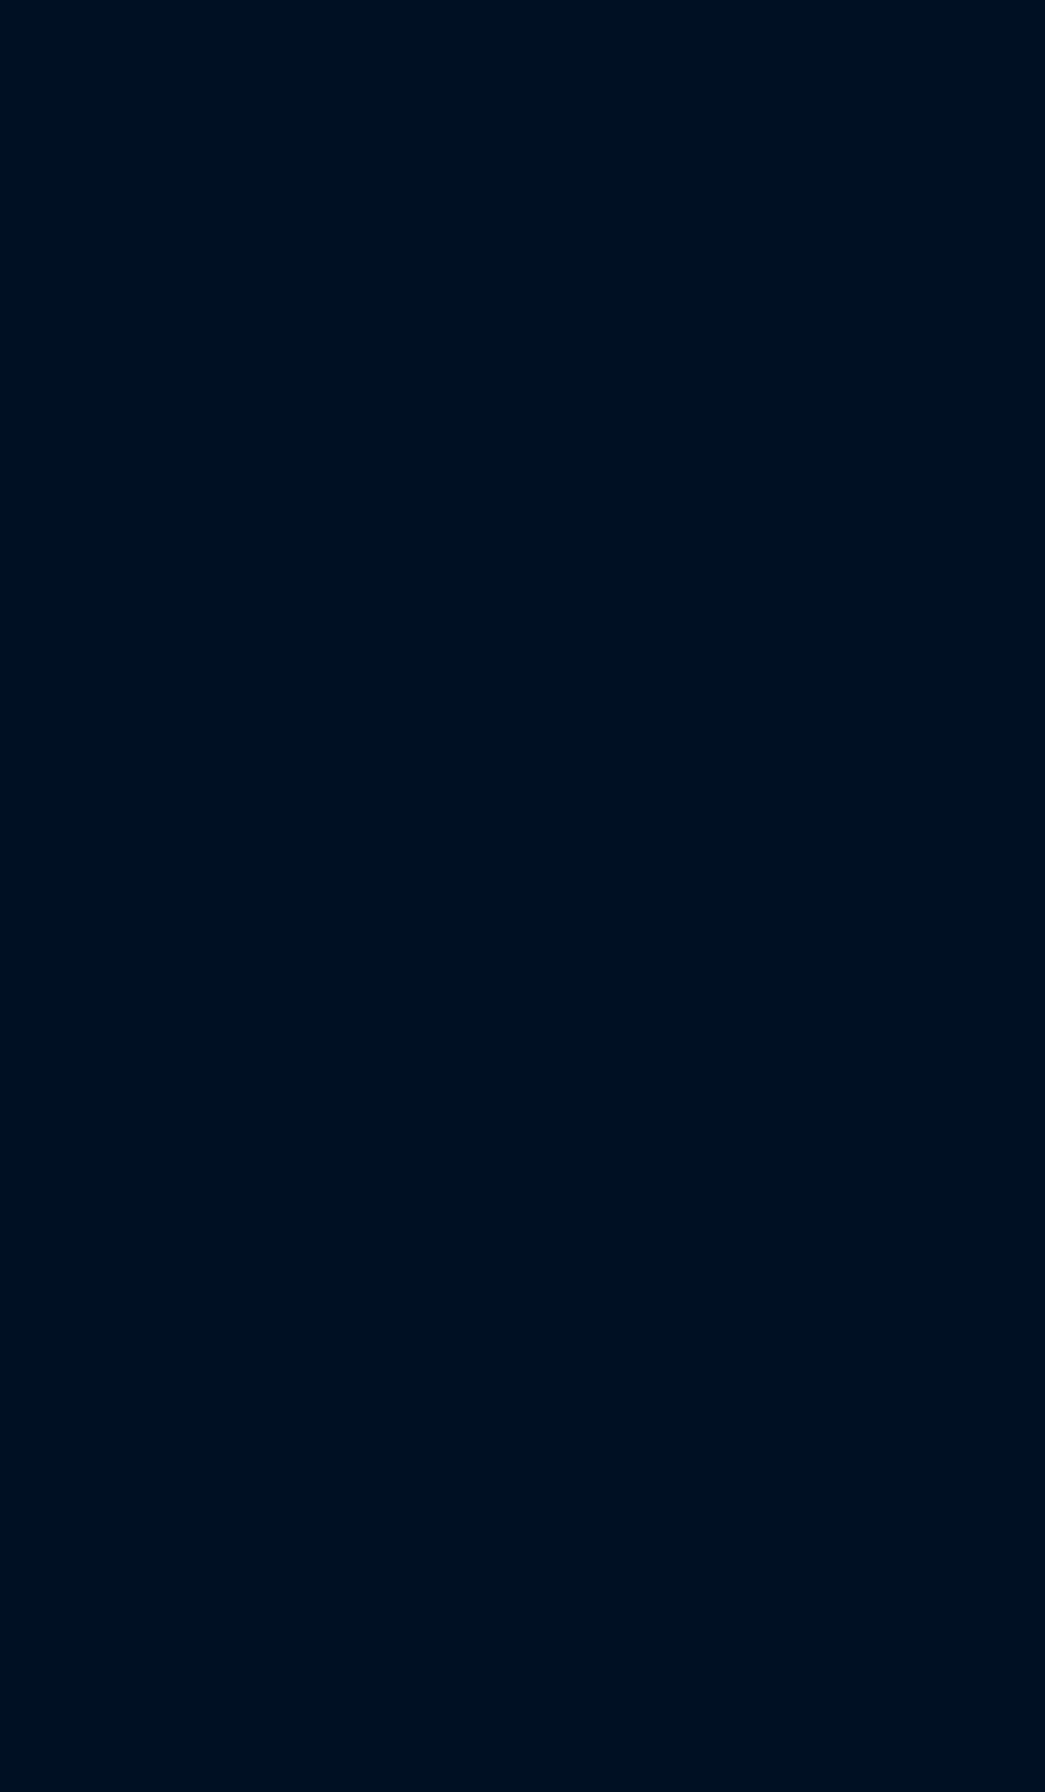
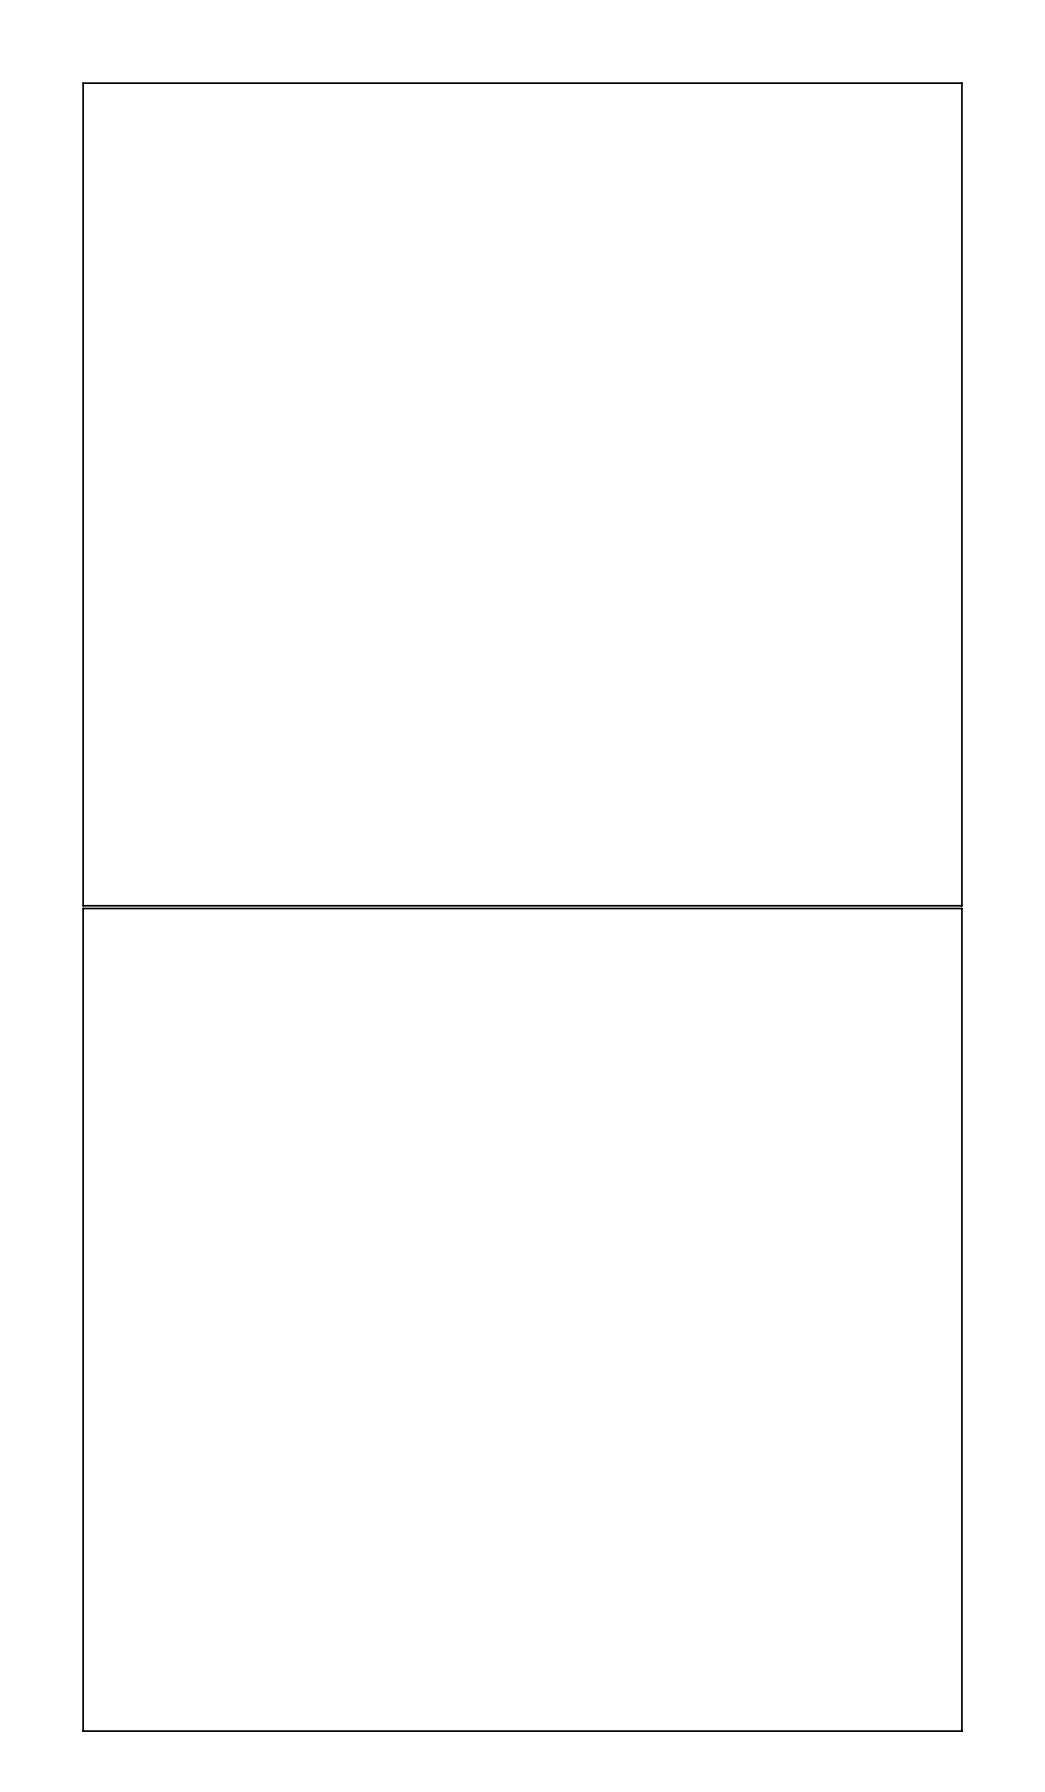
board edge: none -> (961, 83) (83, 83) (83, 905) (961, 905) (961, 83)
board edge: none -> (961, 908) (961, 1731) (83, 1731) (83, 908) (961, 908)

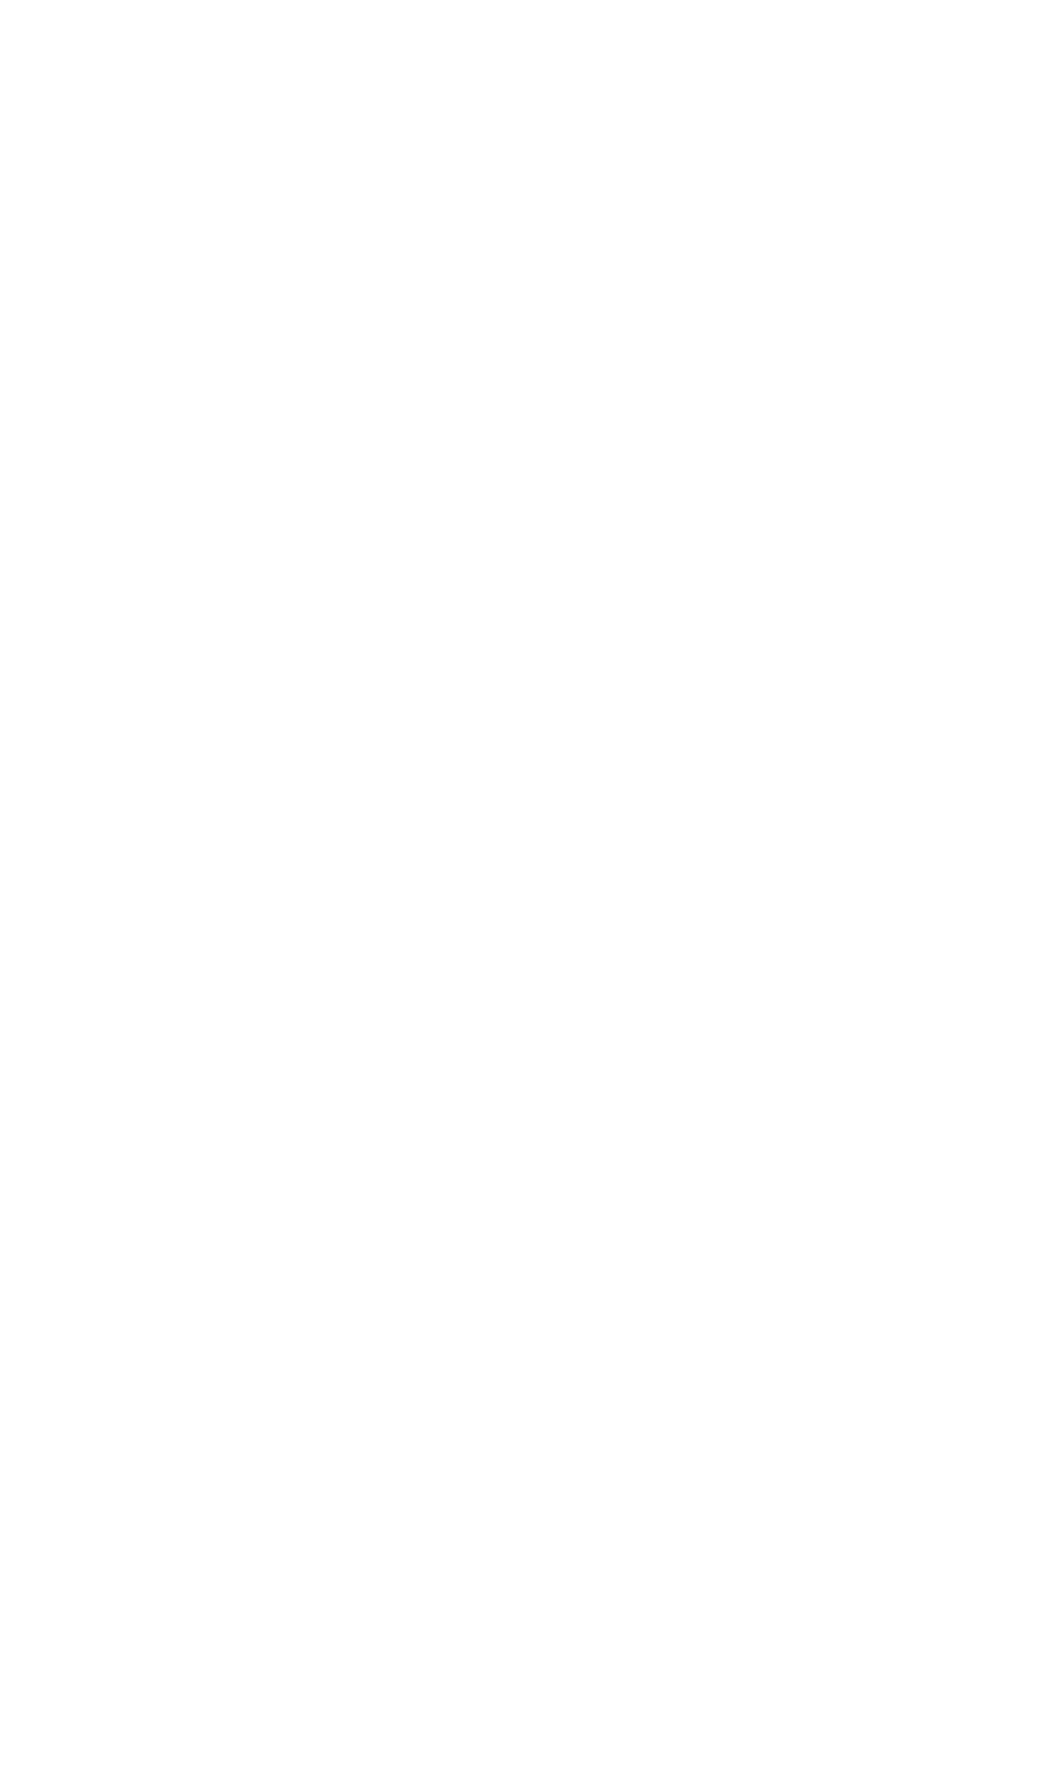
board edge: (961, 83) (83, 83) (83, 905) (961, 905) (961, 83) -> none
board edge: (961, 908) (961, 1731) (83, 1731) (83, 908) (961, 908) -> none

